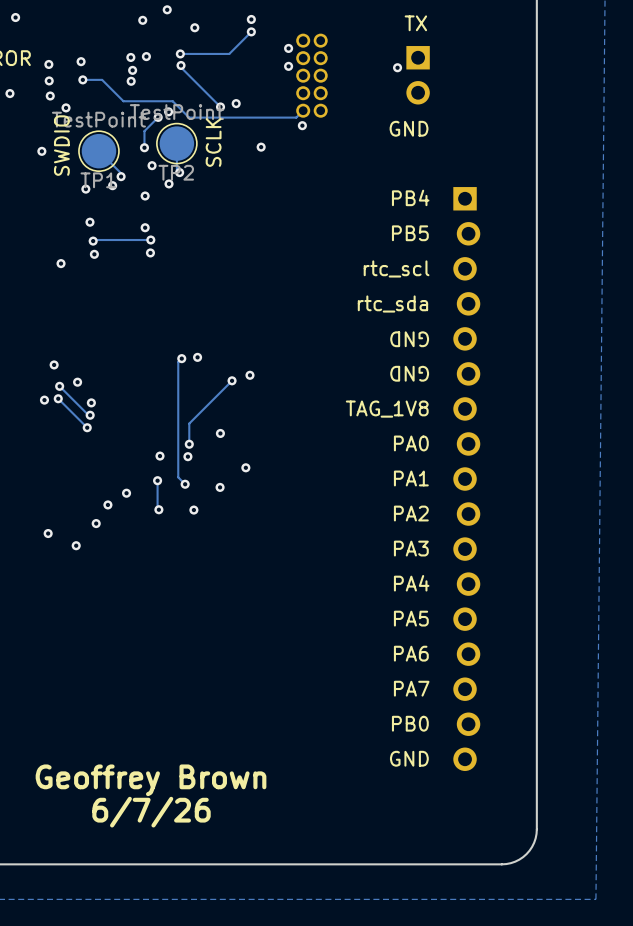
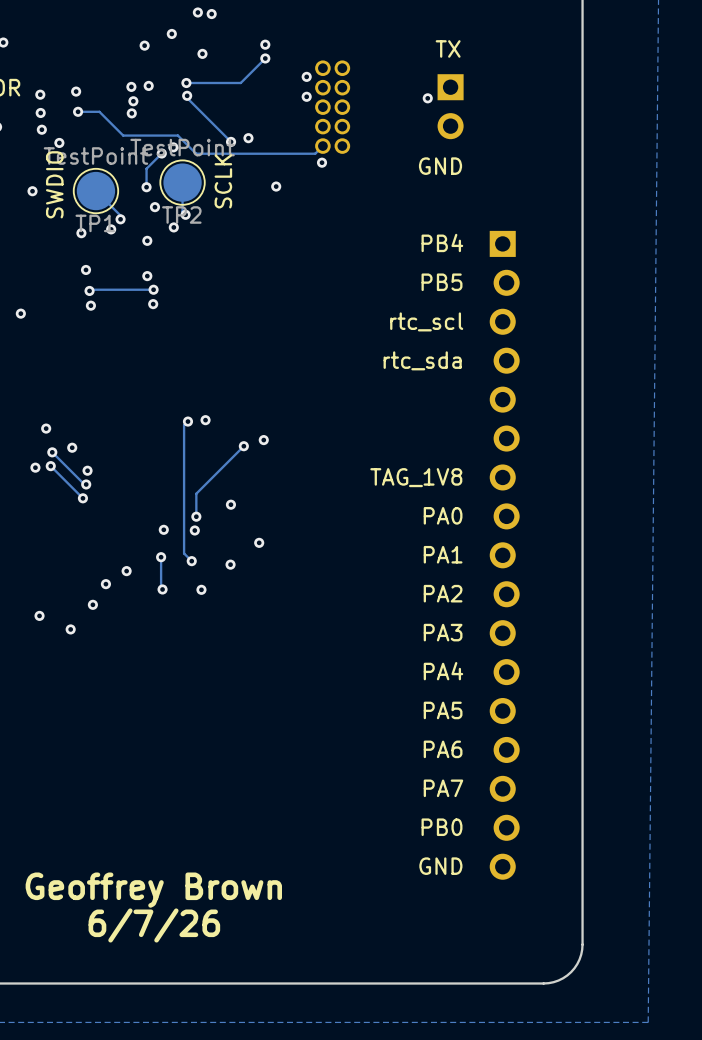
via position: (61, 263) -> (20, 313)
text: GND (409, 339) -> none
text: GND (409, 373) -> none

